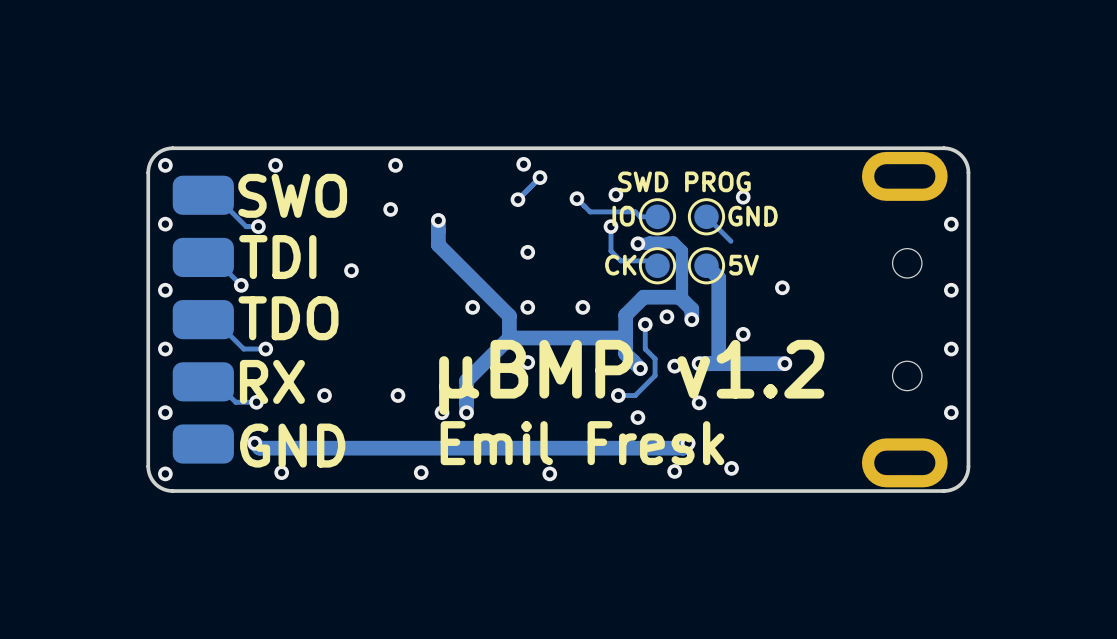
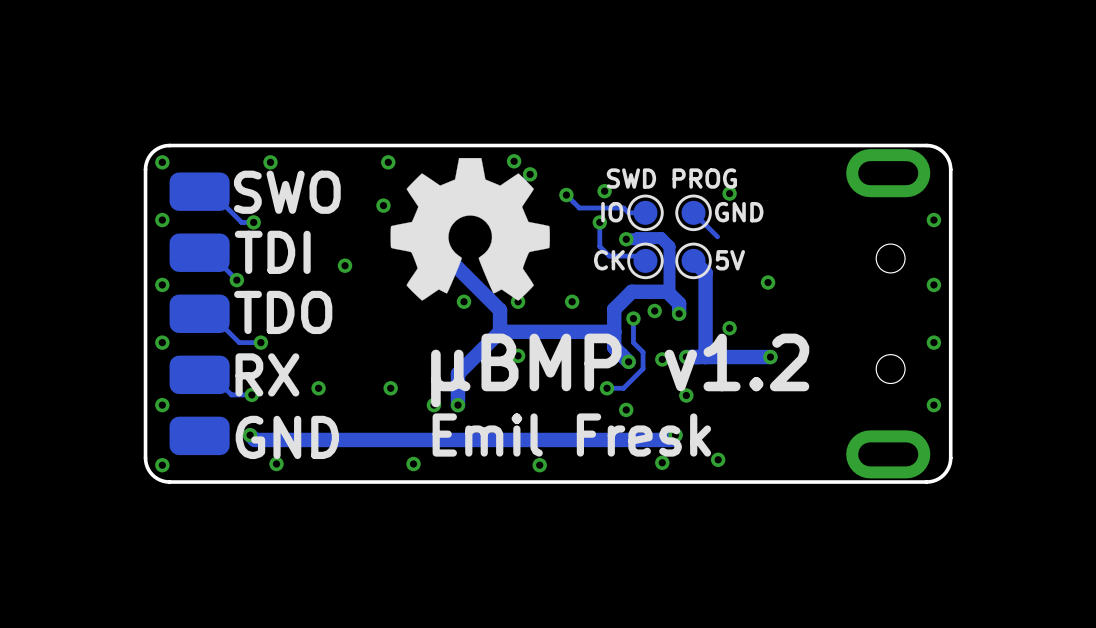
drawing: none -> [390, 158, 550, 301]

